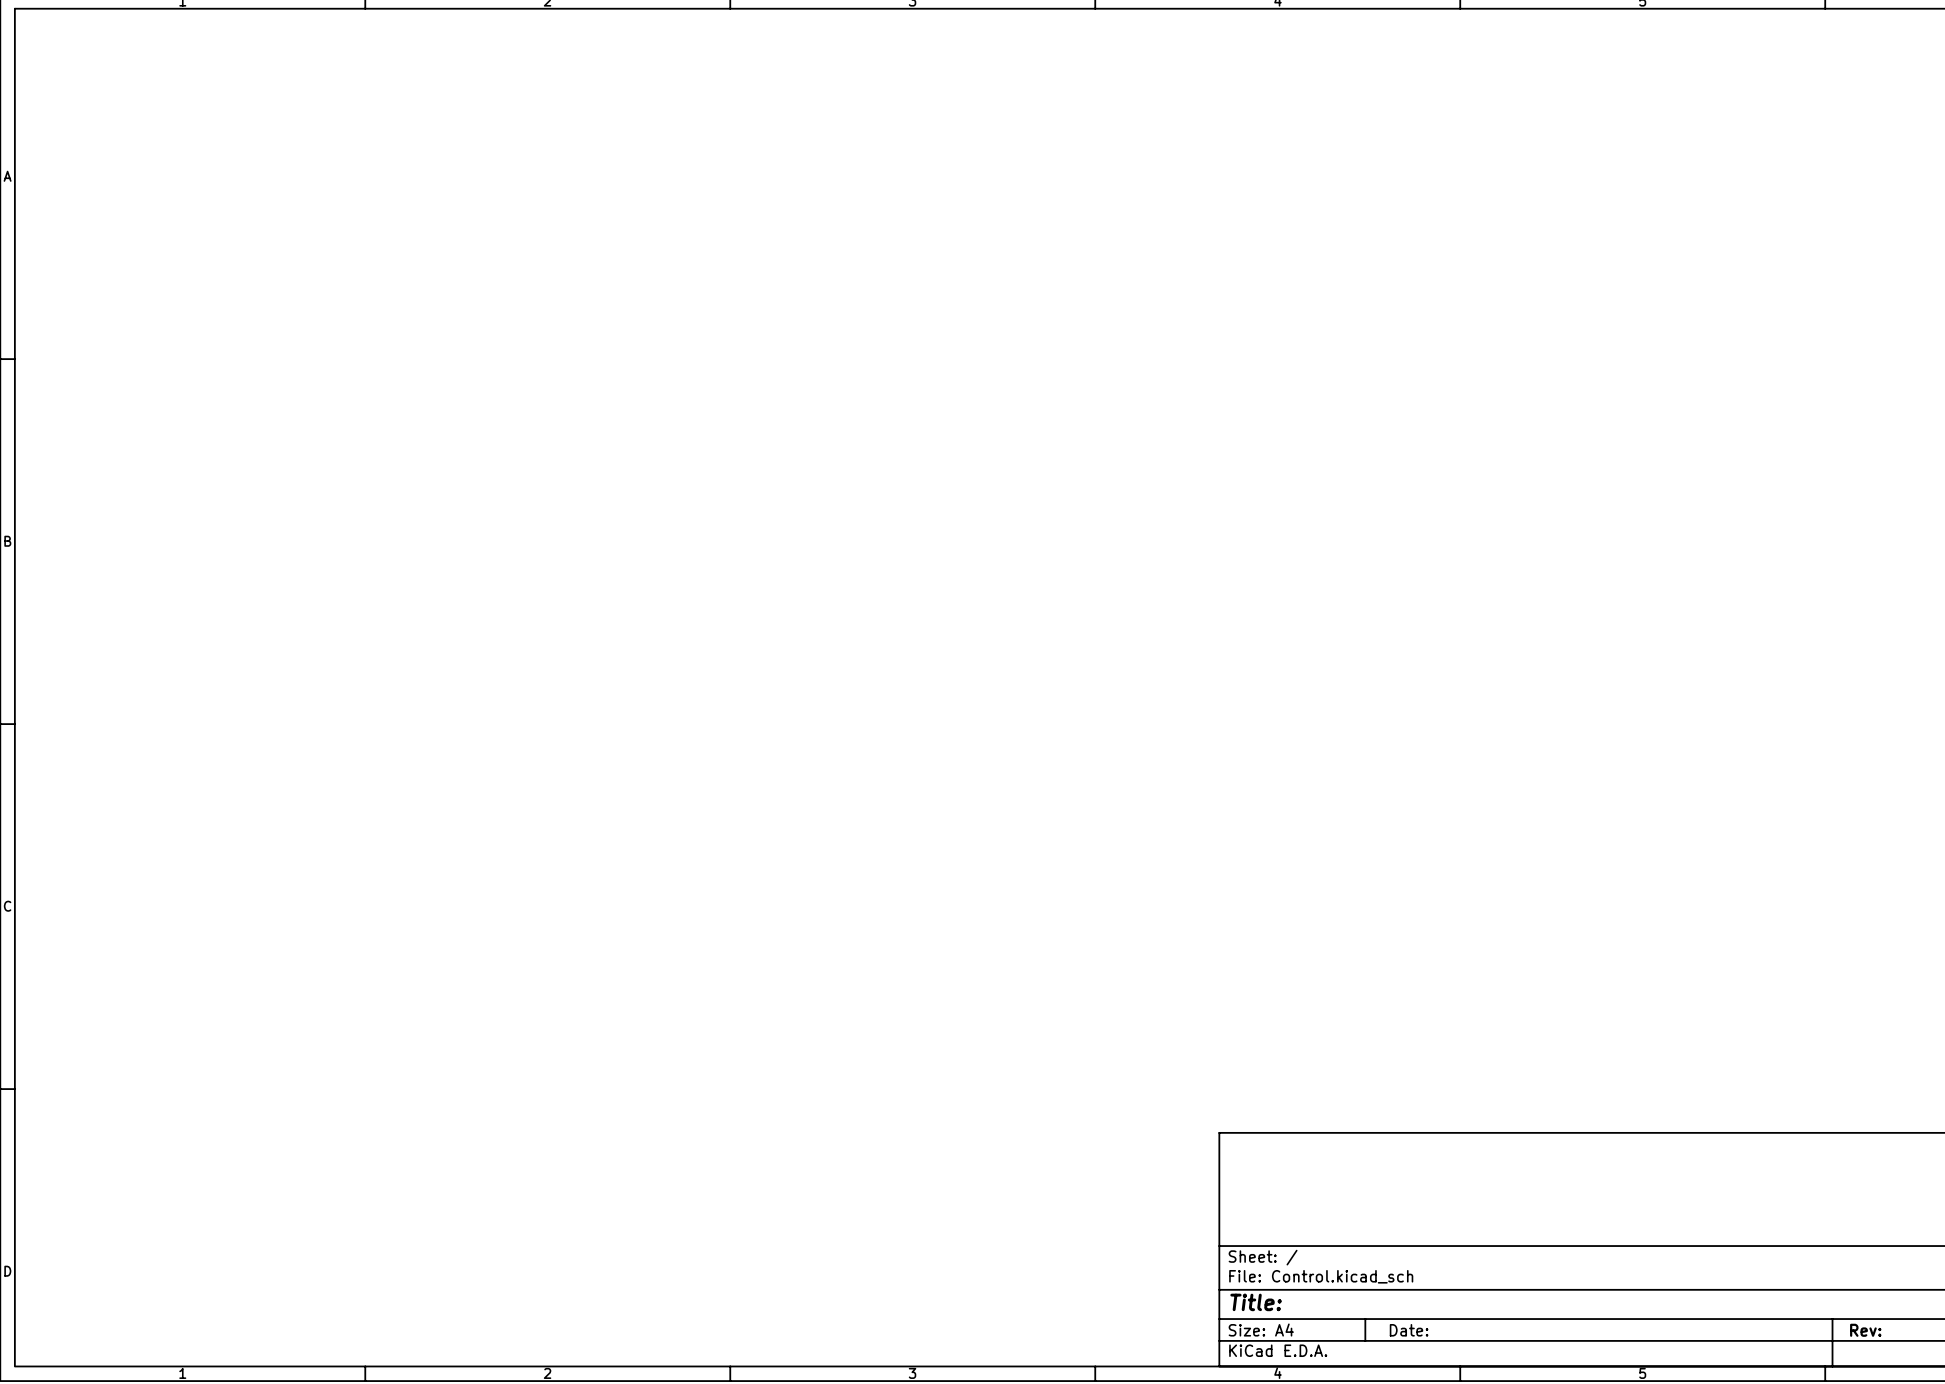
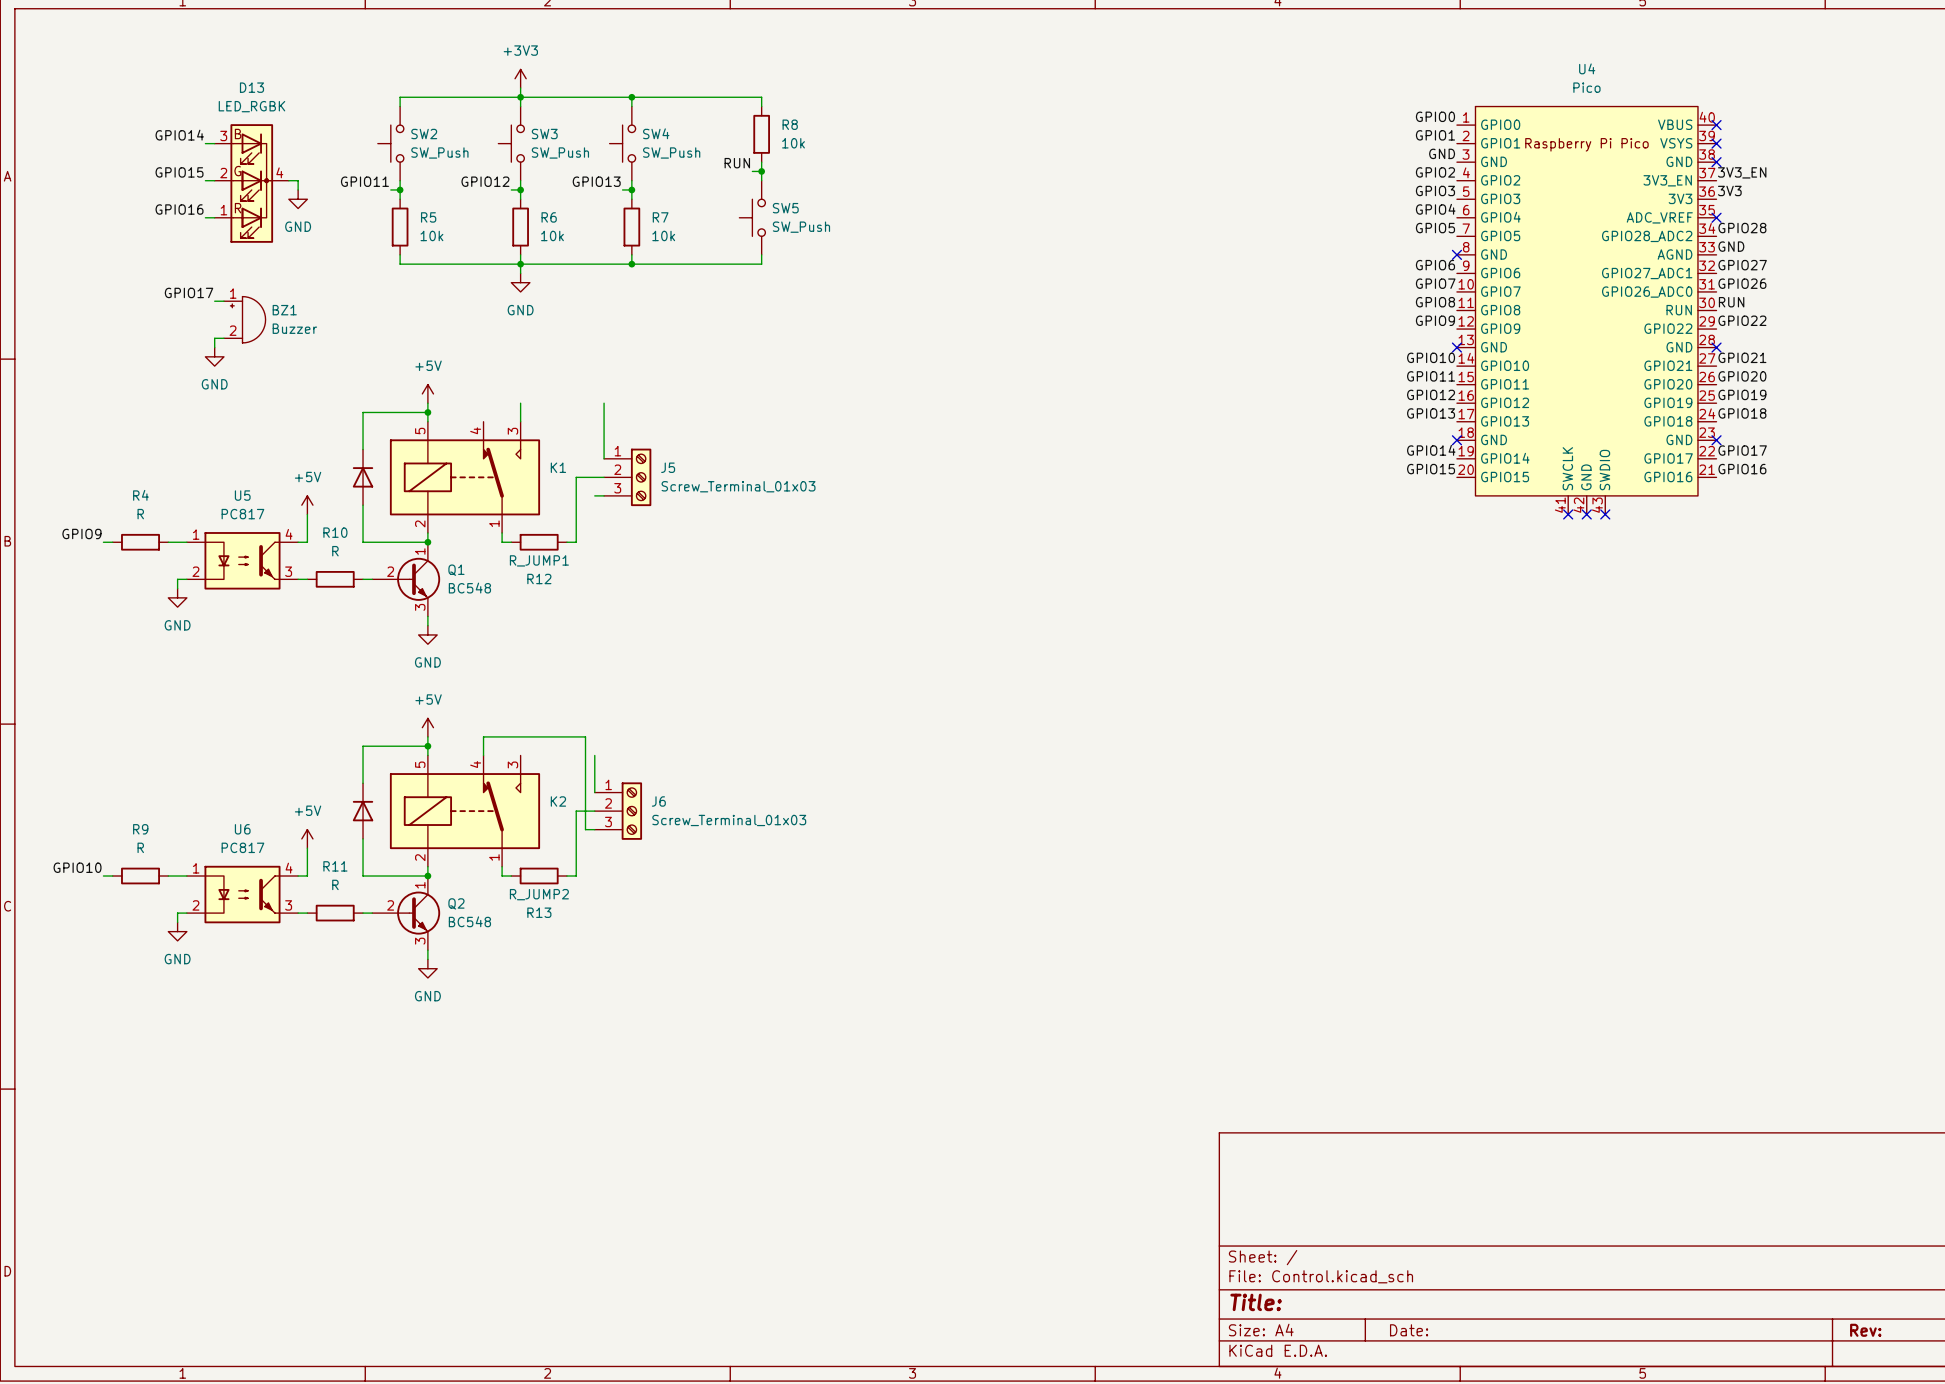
power symbol: none -> +3V3 (520, 78)
wire: none -> (520, 88) (520, 106)
junction: none -> (520, 97)
wire: none -> (631, 97) (631, 106)
junction: none -> (631, 97)
wire: none -> (400, 106) (400, 97) (761, 97) (761, 106)
label: none -> GPIO0 (1435, 116)
no-connect mark: none -> (1716, 125)
R8: none -> 10k (761, 134)
label: none -> GPIO14 (179, 135)
label: none -> GPIO1 (1435, 135)
wire: none -> (205, 143) (214, 143)
SW2: none -> SW_Push (390, 143)
SW3: none -> SW_Push (511, 143)
SW4: none -> SW_Push (622, 143)
no-connect mark: none -> (1716, 143)
label: none -> GND (1442, 153)
wire: none -> (761, 162) (761, 180)
no-connect mark: none -> (1716, 162)
label: none -> RUN (737, 163)
wire: none -> (752, 171) (761, 171)
junction: none -> (761, 171)
label: none -> GPIO15 (179, 172)
label: none -> GPIO2 (1435, 172)
label: none -> 3V3_EN (1742, 172)
wire: none -> (205, 180) (214, 180)
wire: none -> (288, 180) (298, 180) (298, 189)
wire: none -> (400, 180) (400, 199)
wire: none -> (520, 180) (520, 199)
wire: none -> (631, 180) (631, 199)
label: none -> GPIO11 (364, 181)
label: none -> GPIO12 (485, 181)
label: none -> GPIO13 (596, 181)
D13: none -> LED_RGBK (251, 183)
wire: none -> (390, 189) (400, 189)
junction: none -> (400, 189)
wire: none -> (511, 189) (520, 189)
junction: none -> (520, 189)
wire: none -> (622, 189) (631, 189)
junction: none -> (631, 189)
label: none -> GPIO3 (1435, 190)
label: none -> 3V3 (1729, 190)
power symbol: none -> GND (298, 199)
label: none -> GPIO16 (179, 209)
label: none -> GPIO4 (1435, 209)
wire: none -> (205, 217) (214, 217)
SW5: none -> SW_Push (752, 217)
no-connect mark: none -> (1716, 217)
R5: none -> 10k (400, 227)
R6: none -> 10k (520, 227)
R7: none -> 10k (631, 227)
label: none -> GPIO5 (1435, 228)
label: none -> GPIO28 (1742, 228)
label: none -> GND (1731, 246)
wire: none -> (400, 254) (400, 264) (761, 264) (761, 254)
wire: none -> (520, 254) (520, 273)
wire: none -> (631, 254) (631, 264)
no-connect mark: none -> (1456, 254)
junction: none -> (520, 264)
junction: none -> (631, 264)
label: none -> GPIO6 (1435, 265)
label: none -> GPIO27 (1742, 265)
power symbol: none -> GND (520, 282)
label: none -> GPIO7 (1435, 283)
label: none -> GPIO26 (1742, 283)
label: none -> GPIO17 (189, 292)
wire: none -> (214, 301) (223, 301)
label: none -> GPIO8 (1435, 302)
label: none -> RUN (1731, 302)
U4: none -> Pico (1586, 310)
BZ1: none -> Buzzer (244, 319)
label: none -> GPIO9 (1435, 320)
label: none -> GPIO22 (1742, 320)
wire: none -> (223, 338) (214, 338) (214, 347)
no-connect mark: none -> (1456, 347)
no-connect mark: none -> (1716, 347)
power symbol: none -> GND (214, 356)
label: none -> GPIO10 (1431, 357)
label: none -> GPIO21 (1742, 357)
label: none -> GPIO11 (1431, 376)
label: none -> GPIO20 (1742, 376)
power symbol: none -> +5V (427, 393)
label: none -> GPIO12 (1431, 394)
label: none -> GPIO19 (1742, 394)
wire: none -> (427, 403) (427, 421)
wire: none -> (520, 403) (520, 421)
wire: none -> (604, 403) (604, 458)
wire: none -> (427, 412) (363, 412) (363, 449)
junction: none -> (427, 412)
label: none -> GPIO13 (1431, 413)
label: none -> GPIO18 (1742, 413)
no-connect mark: none -> (1456, 440)
no-connect mark: none -> (1716, 440)
label: none -> GPIO14 (1431, 450)
label: none -> GPIO17 (1742, 450)
label: none -> GPIO15 (1431, 469)
label: none -> GPIO16 (1742, 469)
part: none -> (363, 477)
K1: none -> (464, 477)
wire: none -> (604, 477) (576, 477) (576, 542) (566, 542)
J5: none -> Screw_Terminal_01x03 (627, 477)
wire: none -> (594, 495) (604, 495)
power symbol: none -> +5V (307, 505)
wire: none -> (363, 505) (363, 542) (427, 542) (427, 532)
wire: none -> (307, 514) (307, 542) (298, 542)
no-connect mark: none -> (1568, 514)
no-connect mark: none -> (1586, 514)
no-connect mark: none -> (1605, 514)
wire: none -> (502, 532) (502, 542) (511, 542)
label: none -> GPIO9 (81, 533)
wire: none -> (103, 542) (112, 542)
R4: none -> R (140, 542)
wire: none -> (168, 542) (186, 542)
junction: none -> (427, 542)
R12: none -> R_JUMP1 (539, 542)
U5: none -> PC817 (242, 560)
wire: none -> (186, 579) (177, 579) (177, 588)
wire: none -> (298, 579) (307, 579)
R10: none -> R (335, 579)
wire: none -> (363, 579) (372, 579)
Q1: none -> BC548 (406, 579)
power symbol: none -> GND (177, 597)
wire: none -> (427, 616) (427, 625)
power symbol: none -> GND (427, 634)
power symbol: none -> +5V (427, 727)
wire: none -> (427, 736) (427, 755)
wire: none -> (427, 746) (363, 746) (363, 783)
junction: none -> (427, 746)
wire: none -> (483, 755) (483, 736) (585, 736) (585, 829) (594, 829)
wire: none -> (594, 755) (594, 792)
part: none -> (363, 811)
K2: none -> (464, 811)
wire: none -> (594, 811) (576, 811) (576, 876) (566, 876)
J6: none -> Screw_Terminal_01x03 (618, 811)
power symbol: none -> +5V (307, 838)
wire: none -> (363, 838) (363, 876) (427, 876) (427, 866)
wire: none -> (307, 848) (307, 876) (298, 876)
wire: none -> (502, 866) (502, 876) (511, 876)
label: none -> GPIO10 (77, 867)
wire: none -> (103, 876) (112, 876)
R9: none -> R (140, 876)
wire: none -> (168, 876) (186, 876)
junction: none -> (427, 876)
R13: none -> R_JUMP2 (539, 876)
U6: none -> PC817 (242, 894)
wire: none -> (186, 913) (177, 913) (177, 922)
wire: none -> (298, 913) (307, 913)
R11: none -> R (335, 913)
wire: none -> (363, 913) (372, 913)
Q2: none -> BC548 (406, 913)
power symbol: none -> GND (177, 931)
wire: none -> (427, 950) (427, 959)
power symbol: none -> GND (427, 968)

